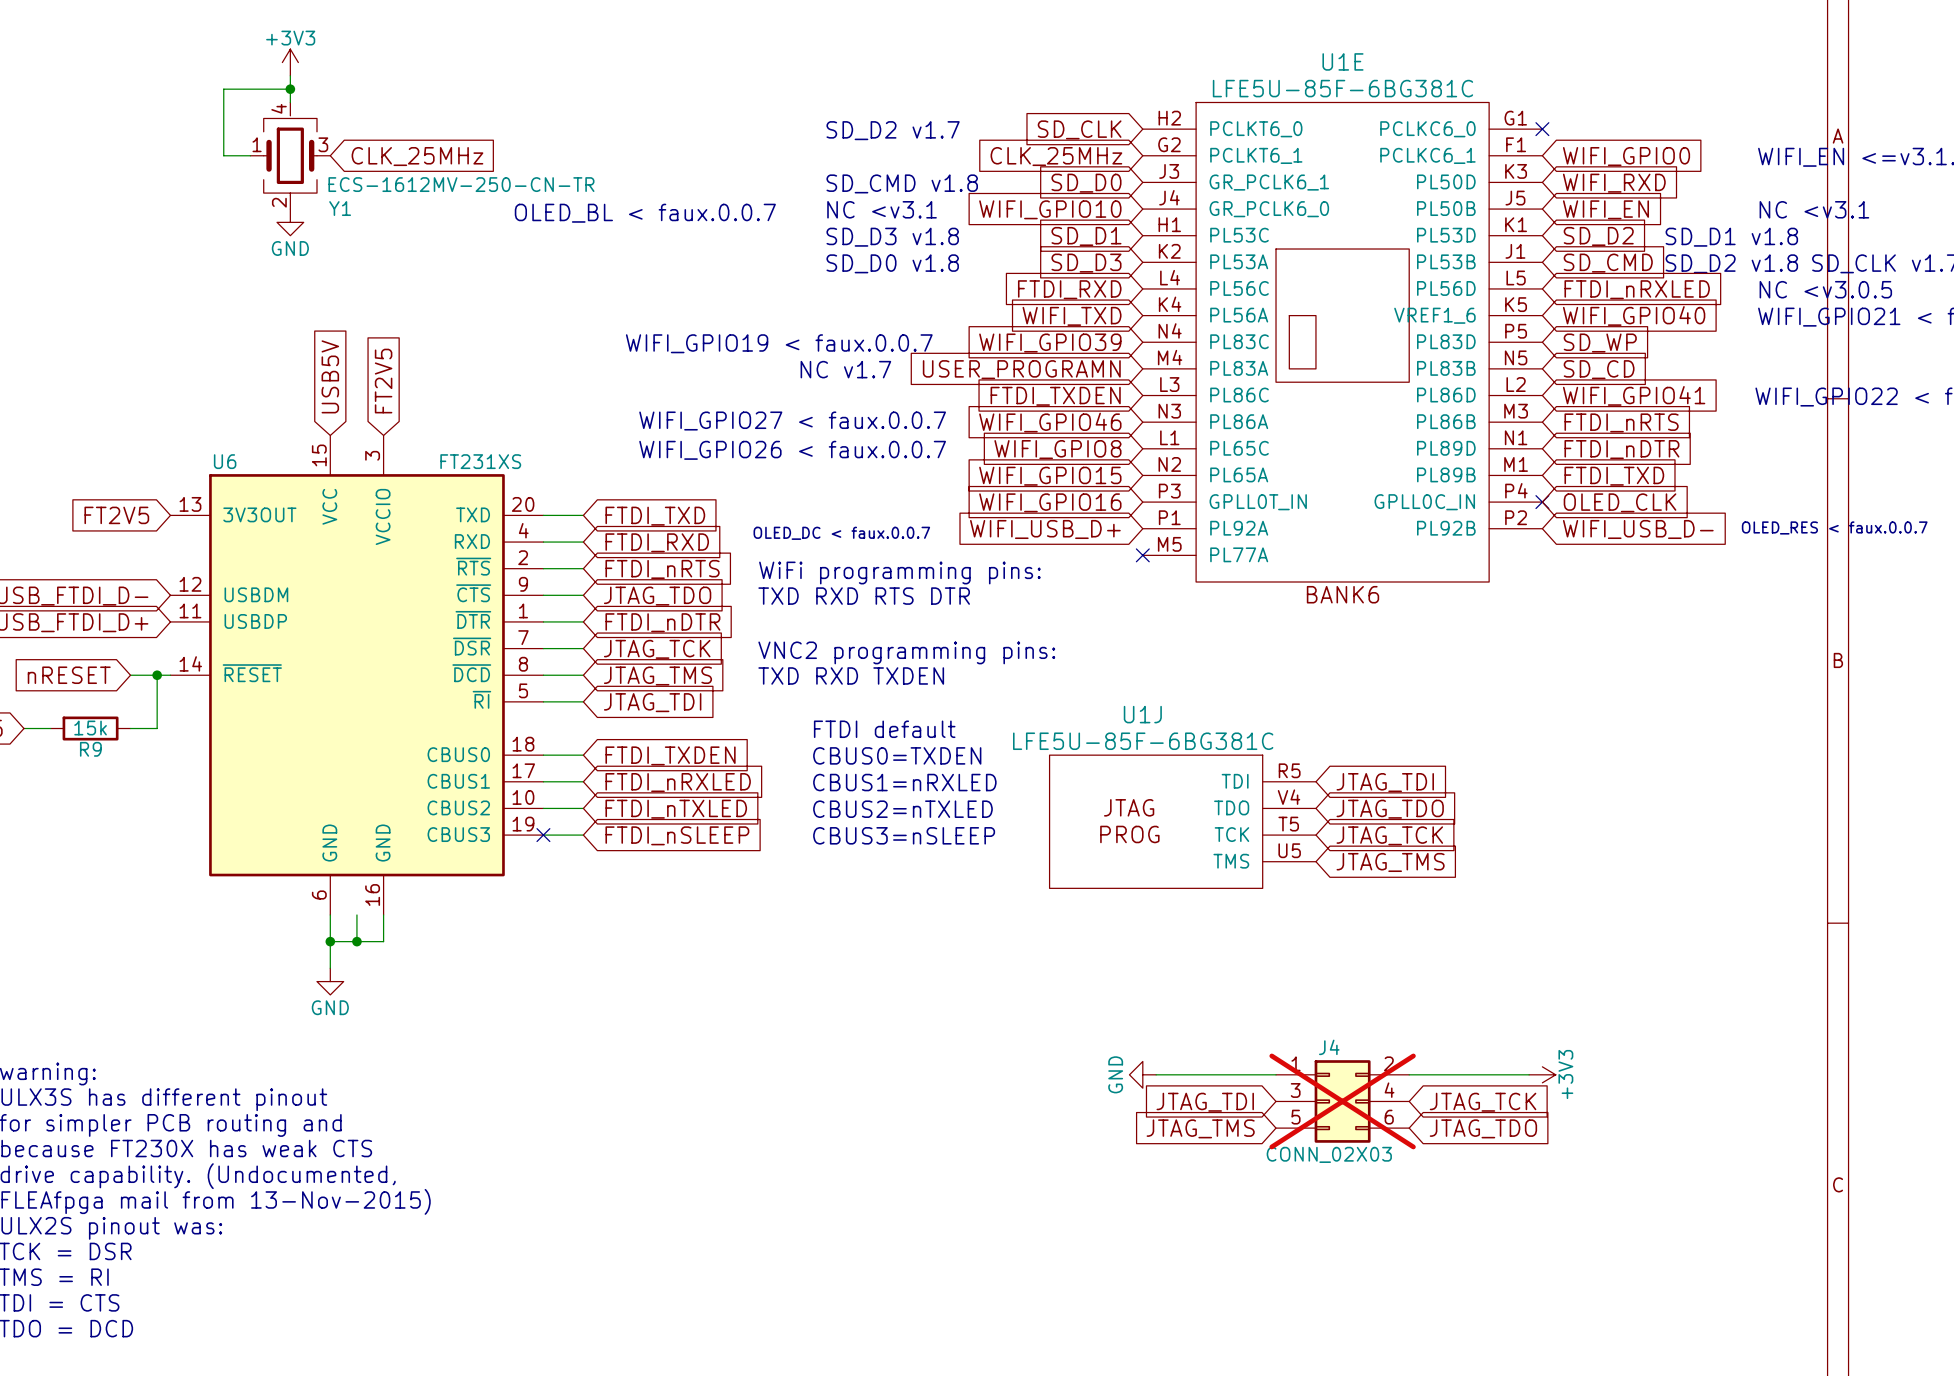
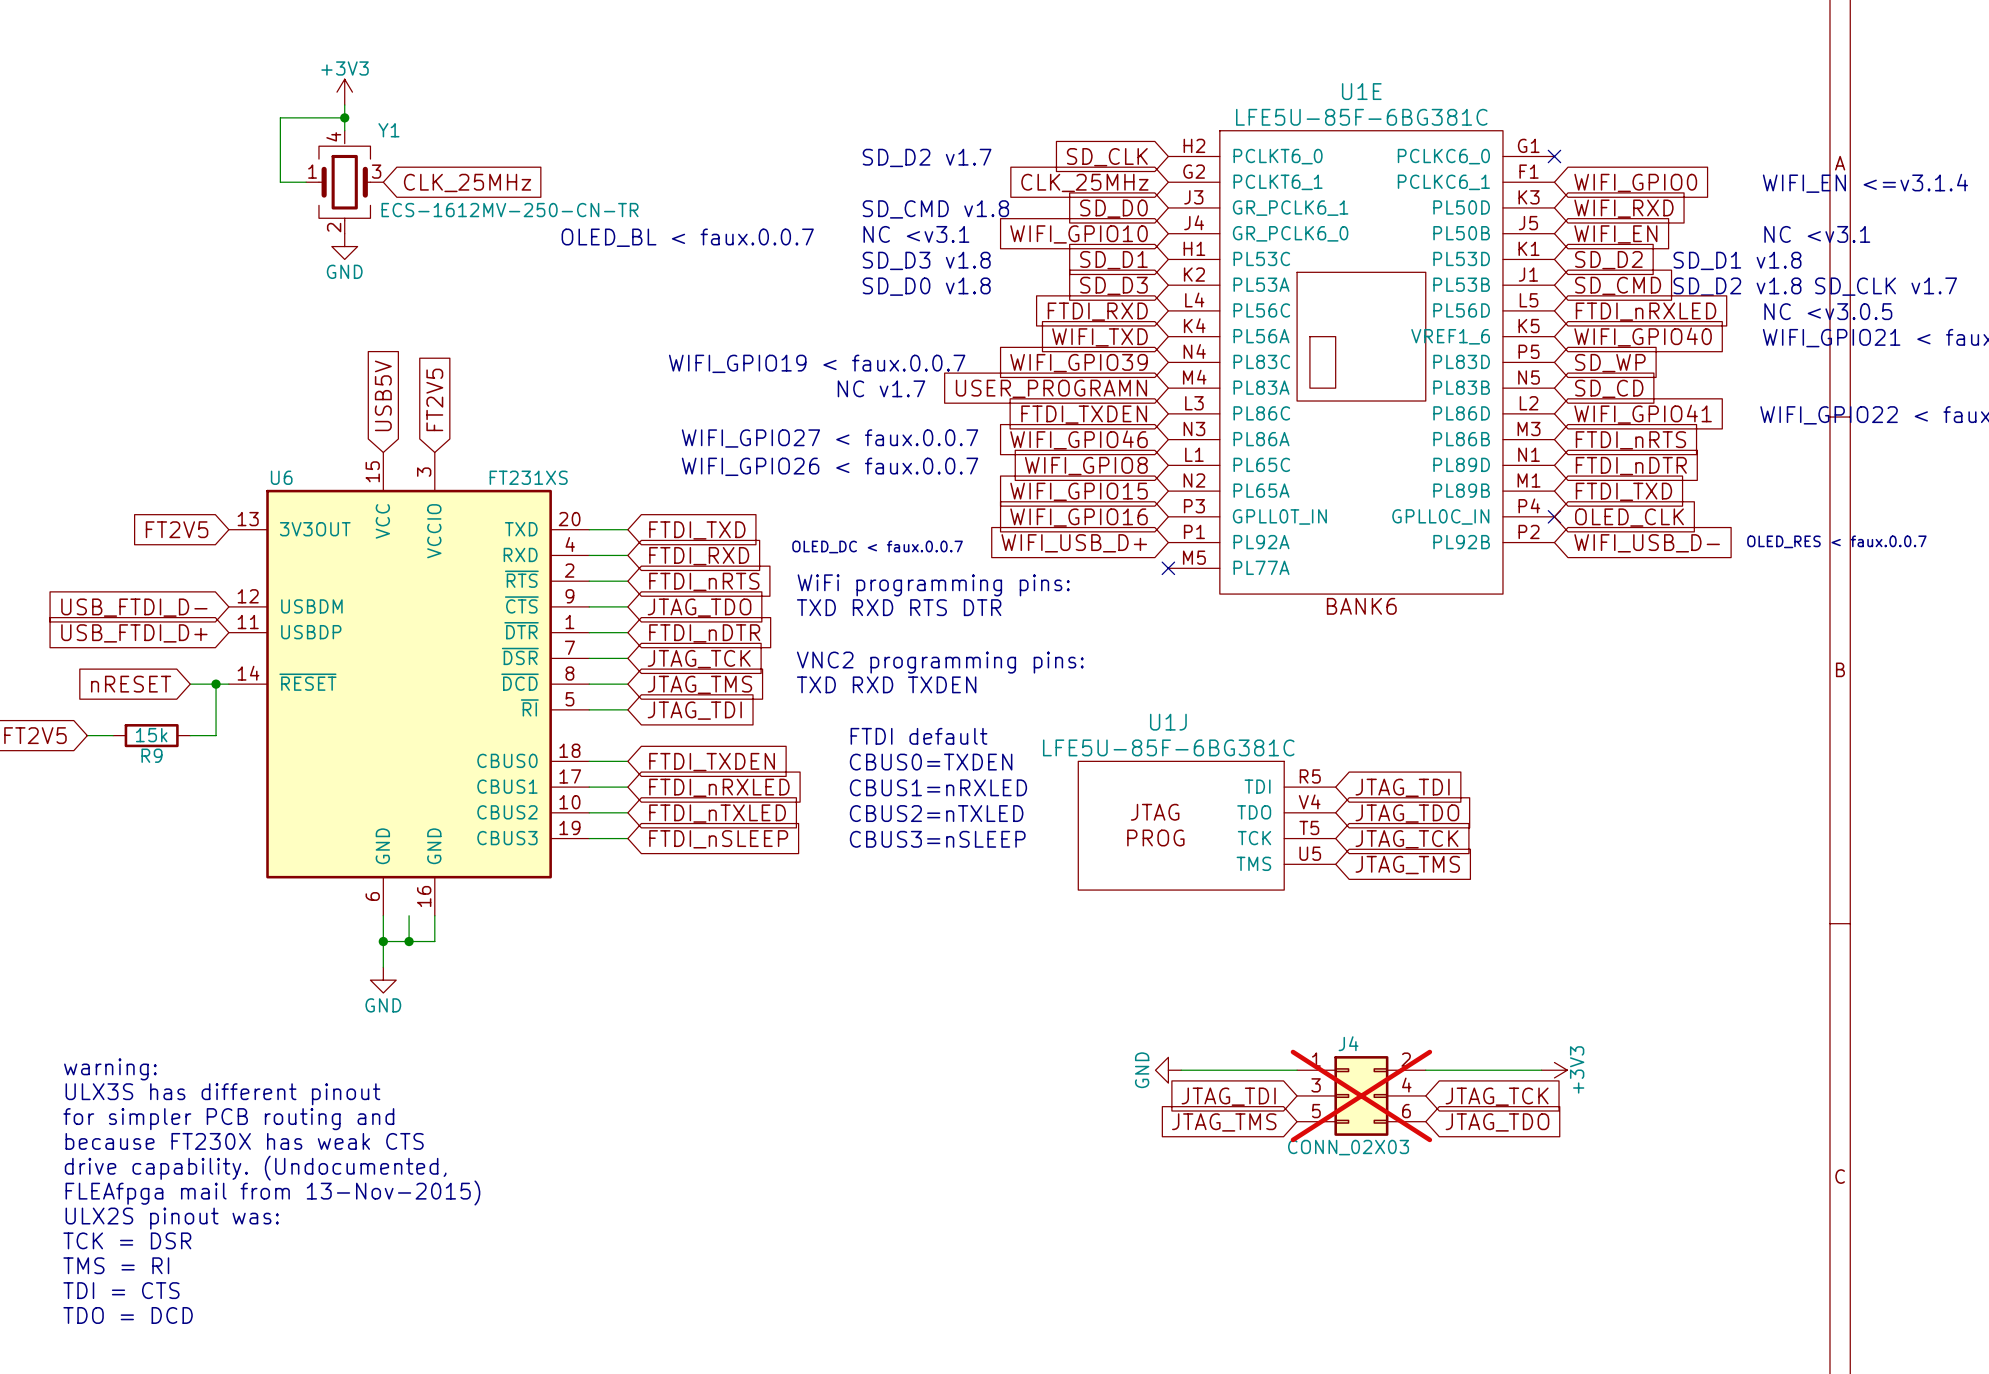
Y1 name position: Y1 (340, 208) -> Y1 (388, 130)
no-connect mark: (543, 835) -> none

